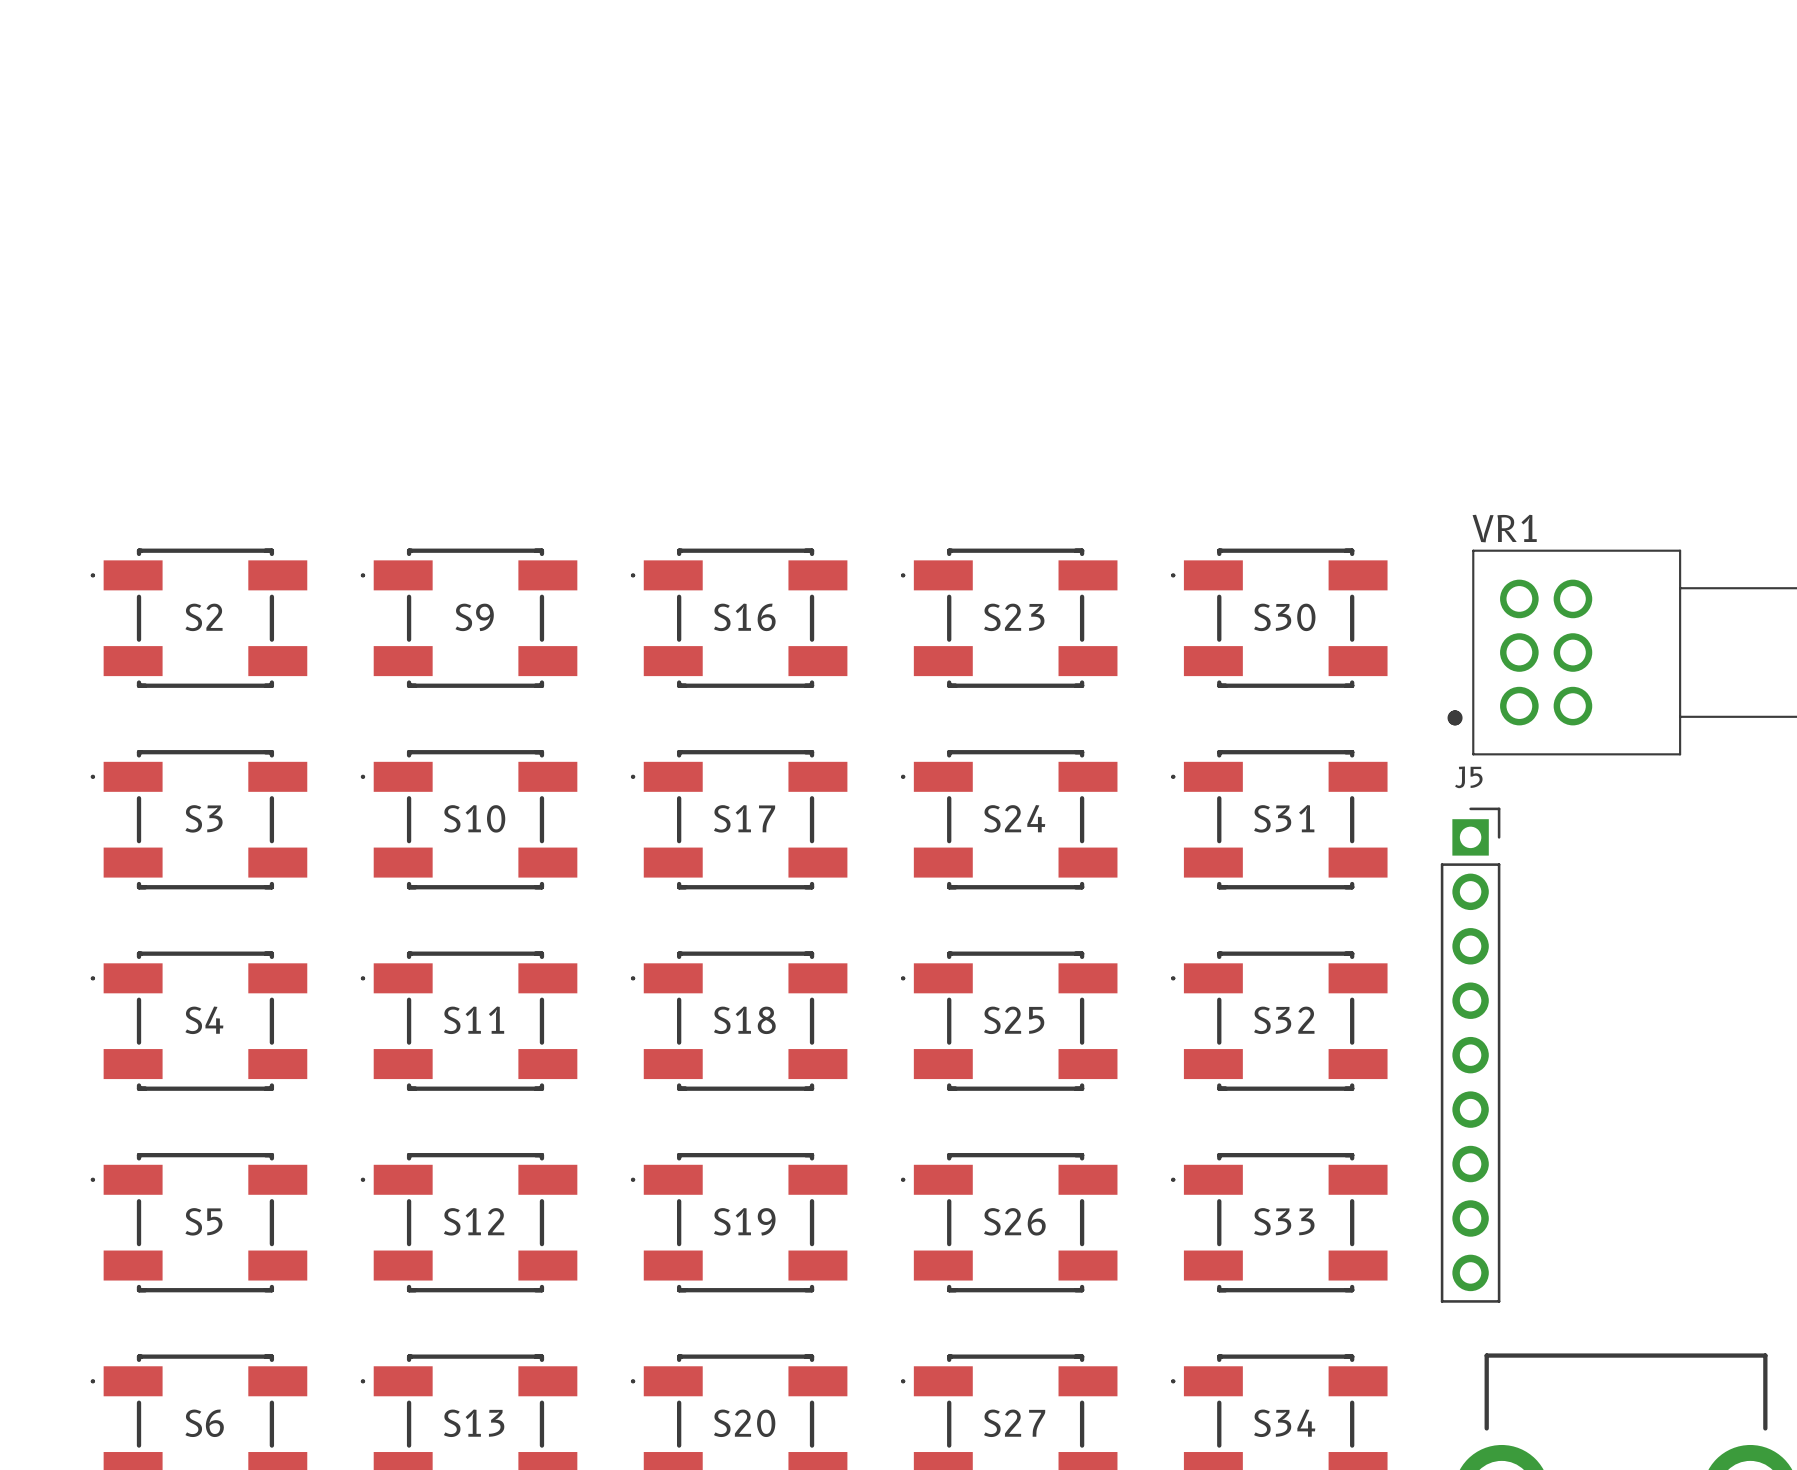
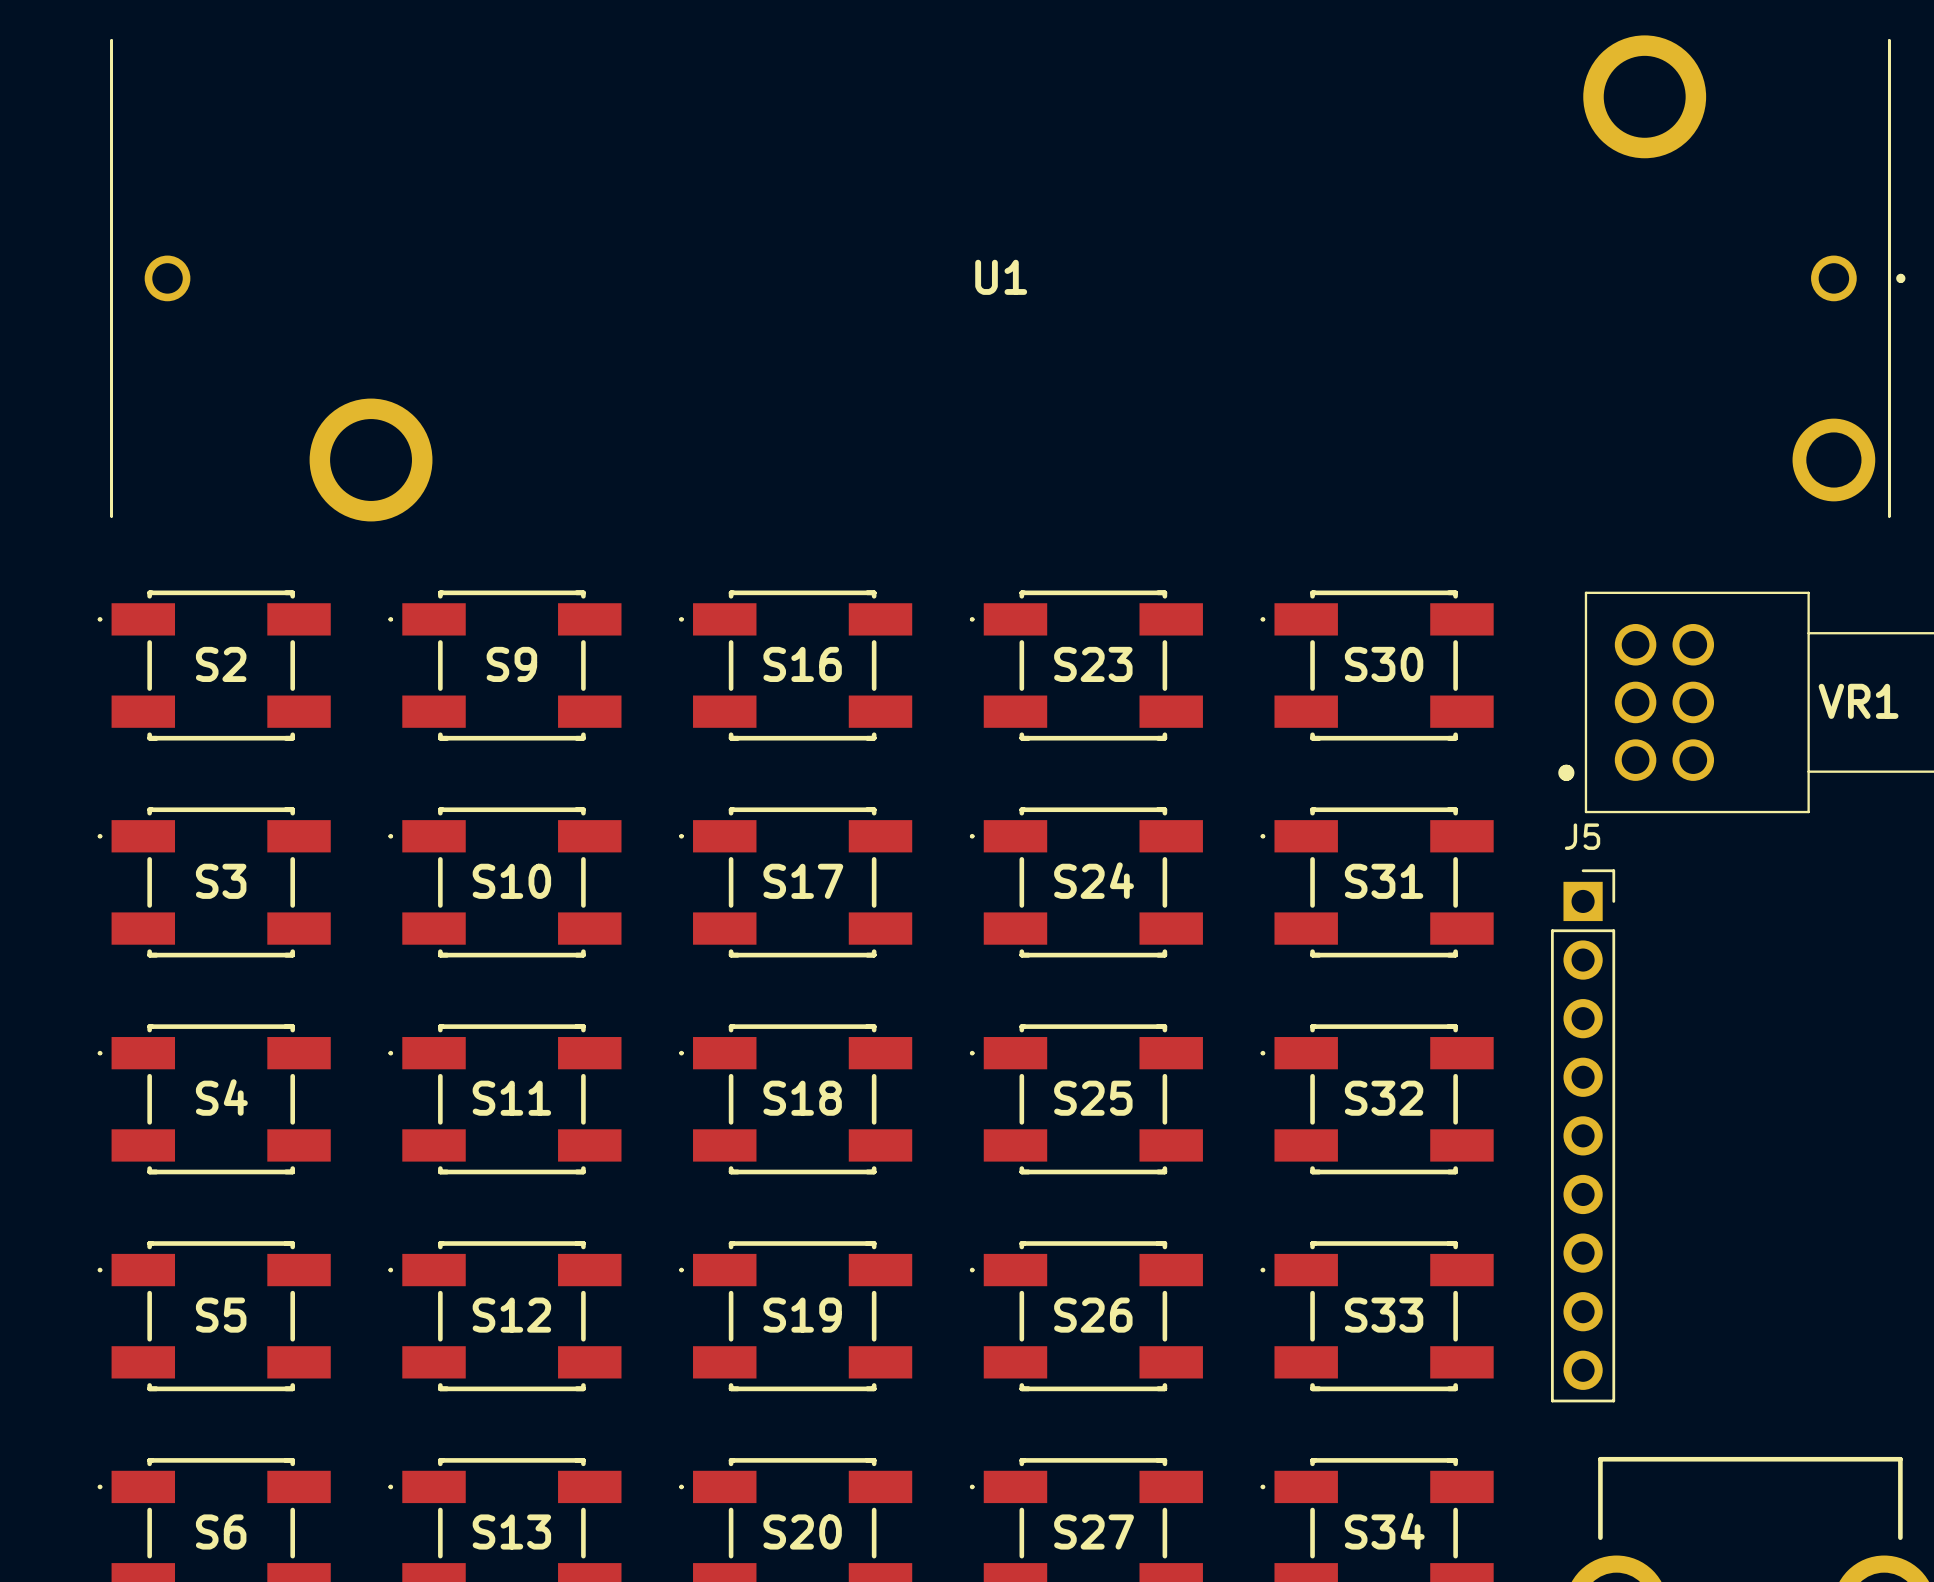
U1: none -> (1007, 278)
VR1 name position: VR1 (1504, 528) -> VR1 (1858, 701)

